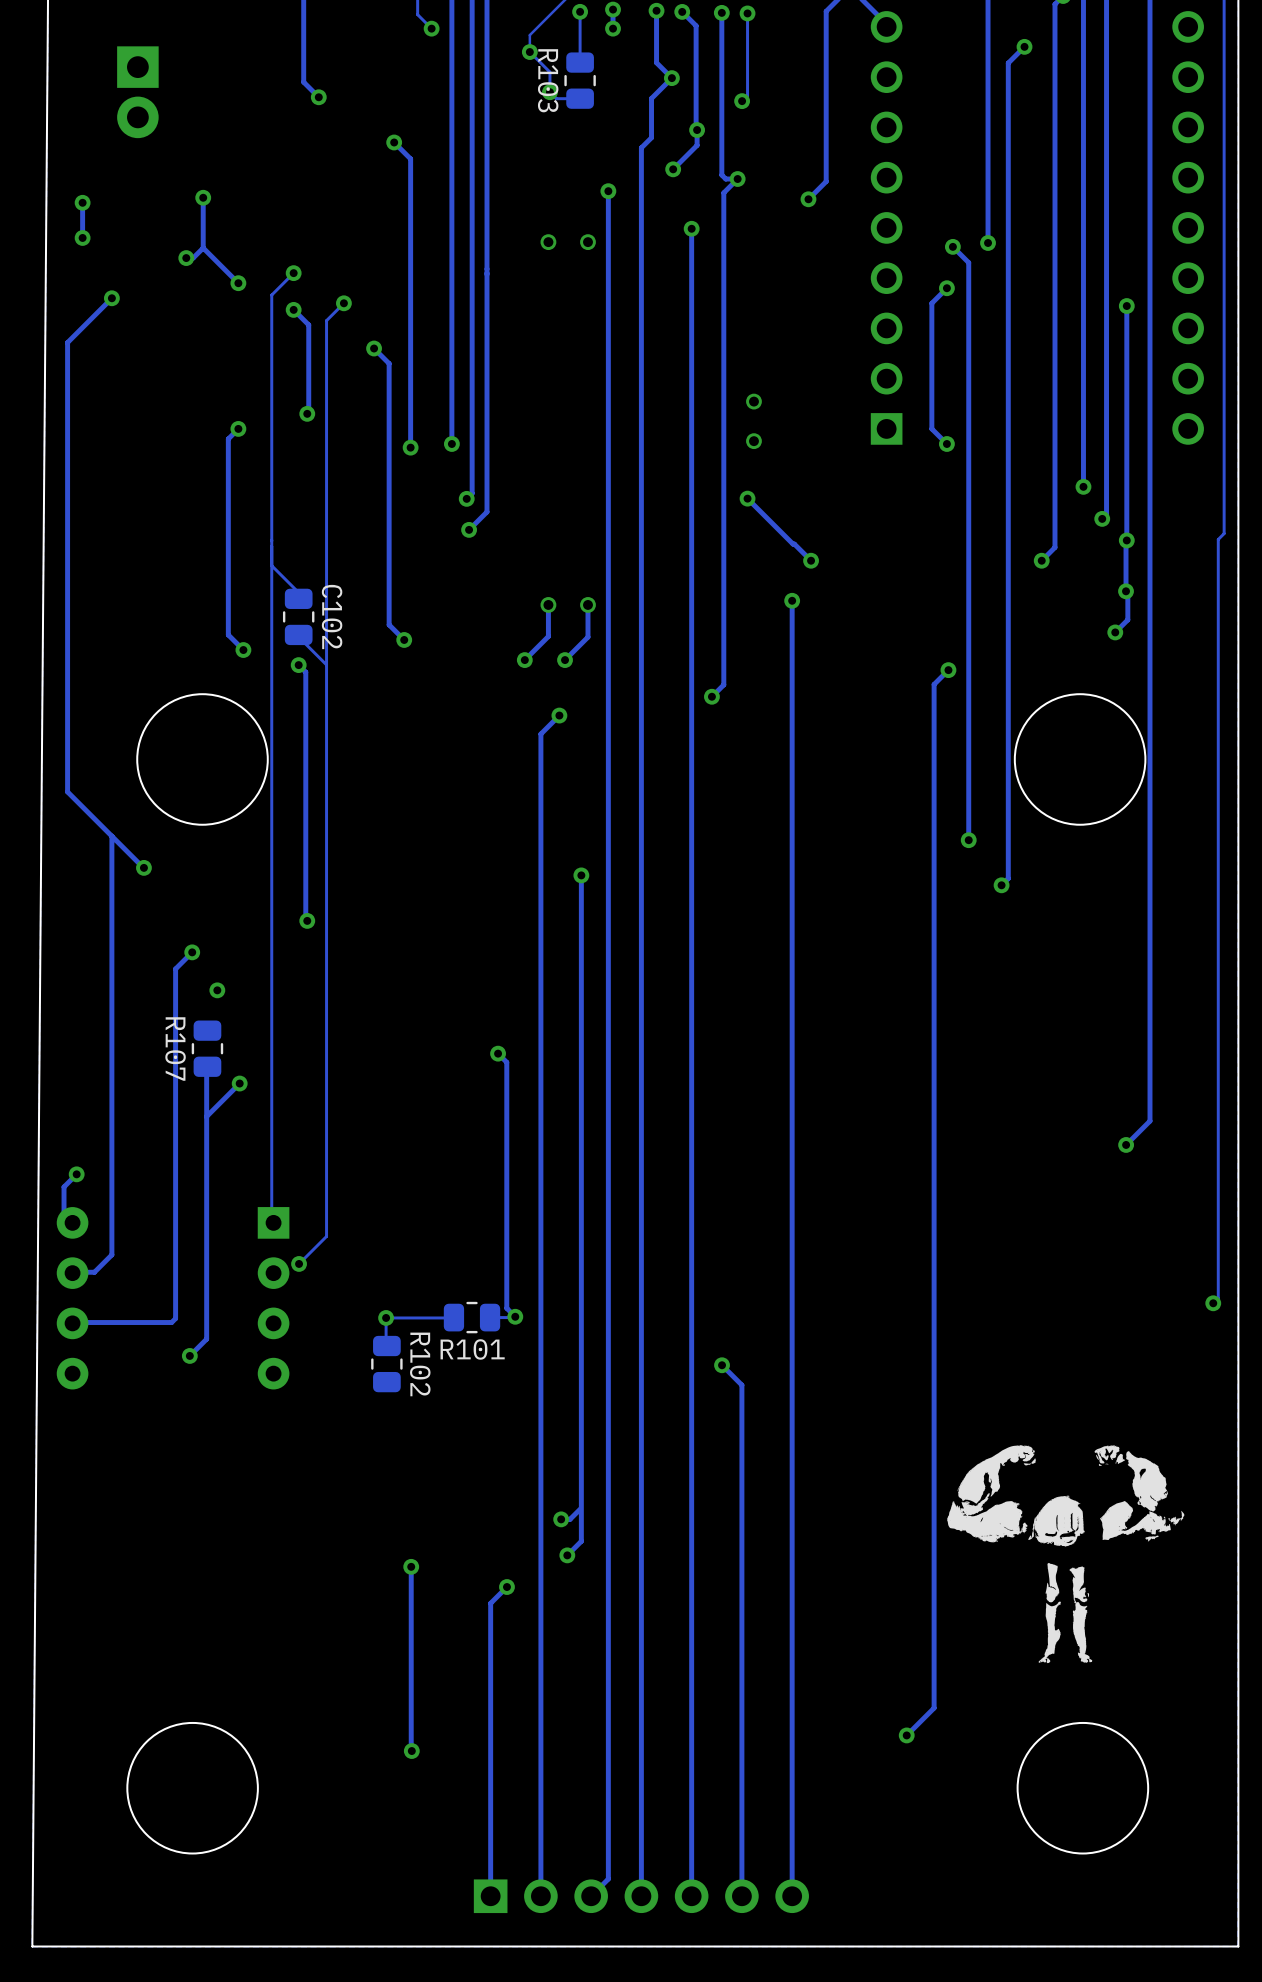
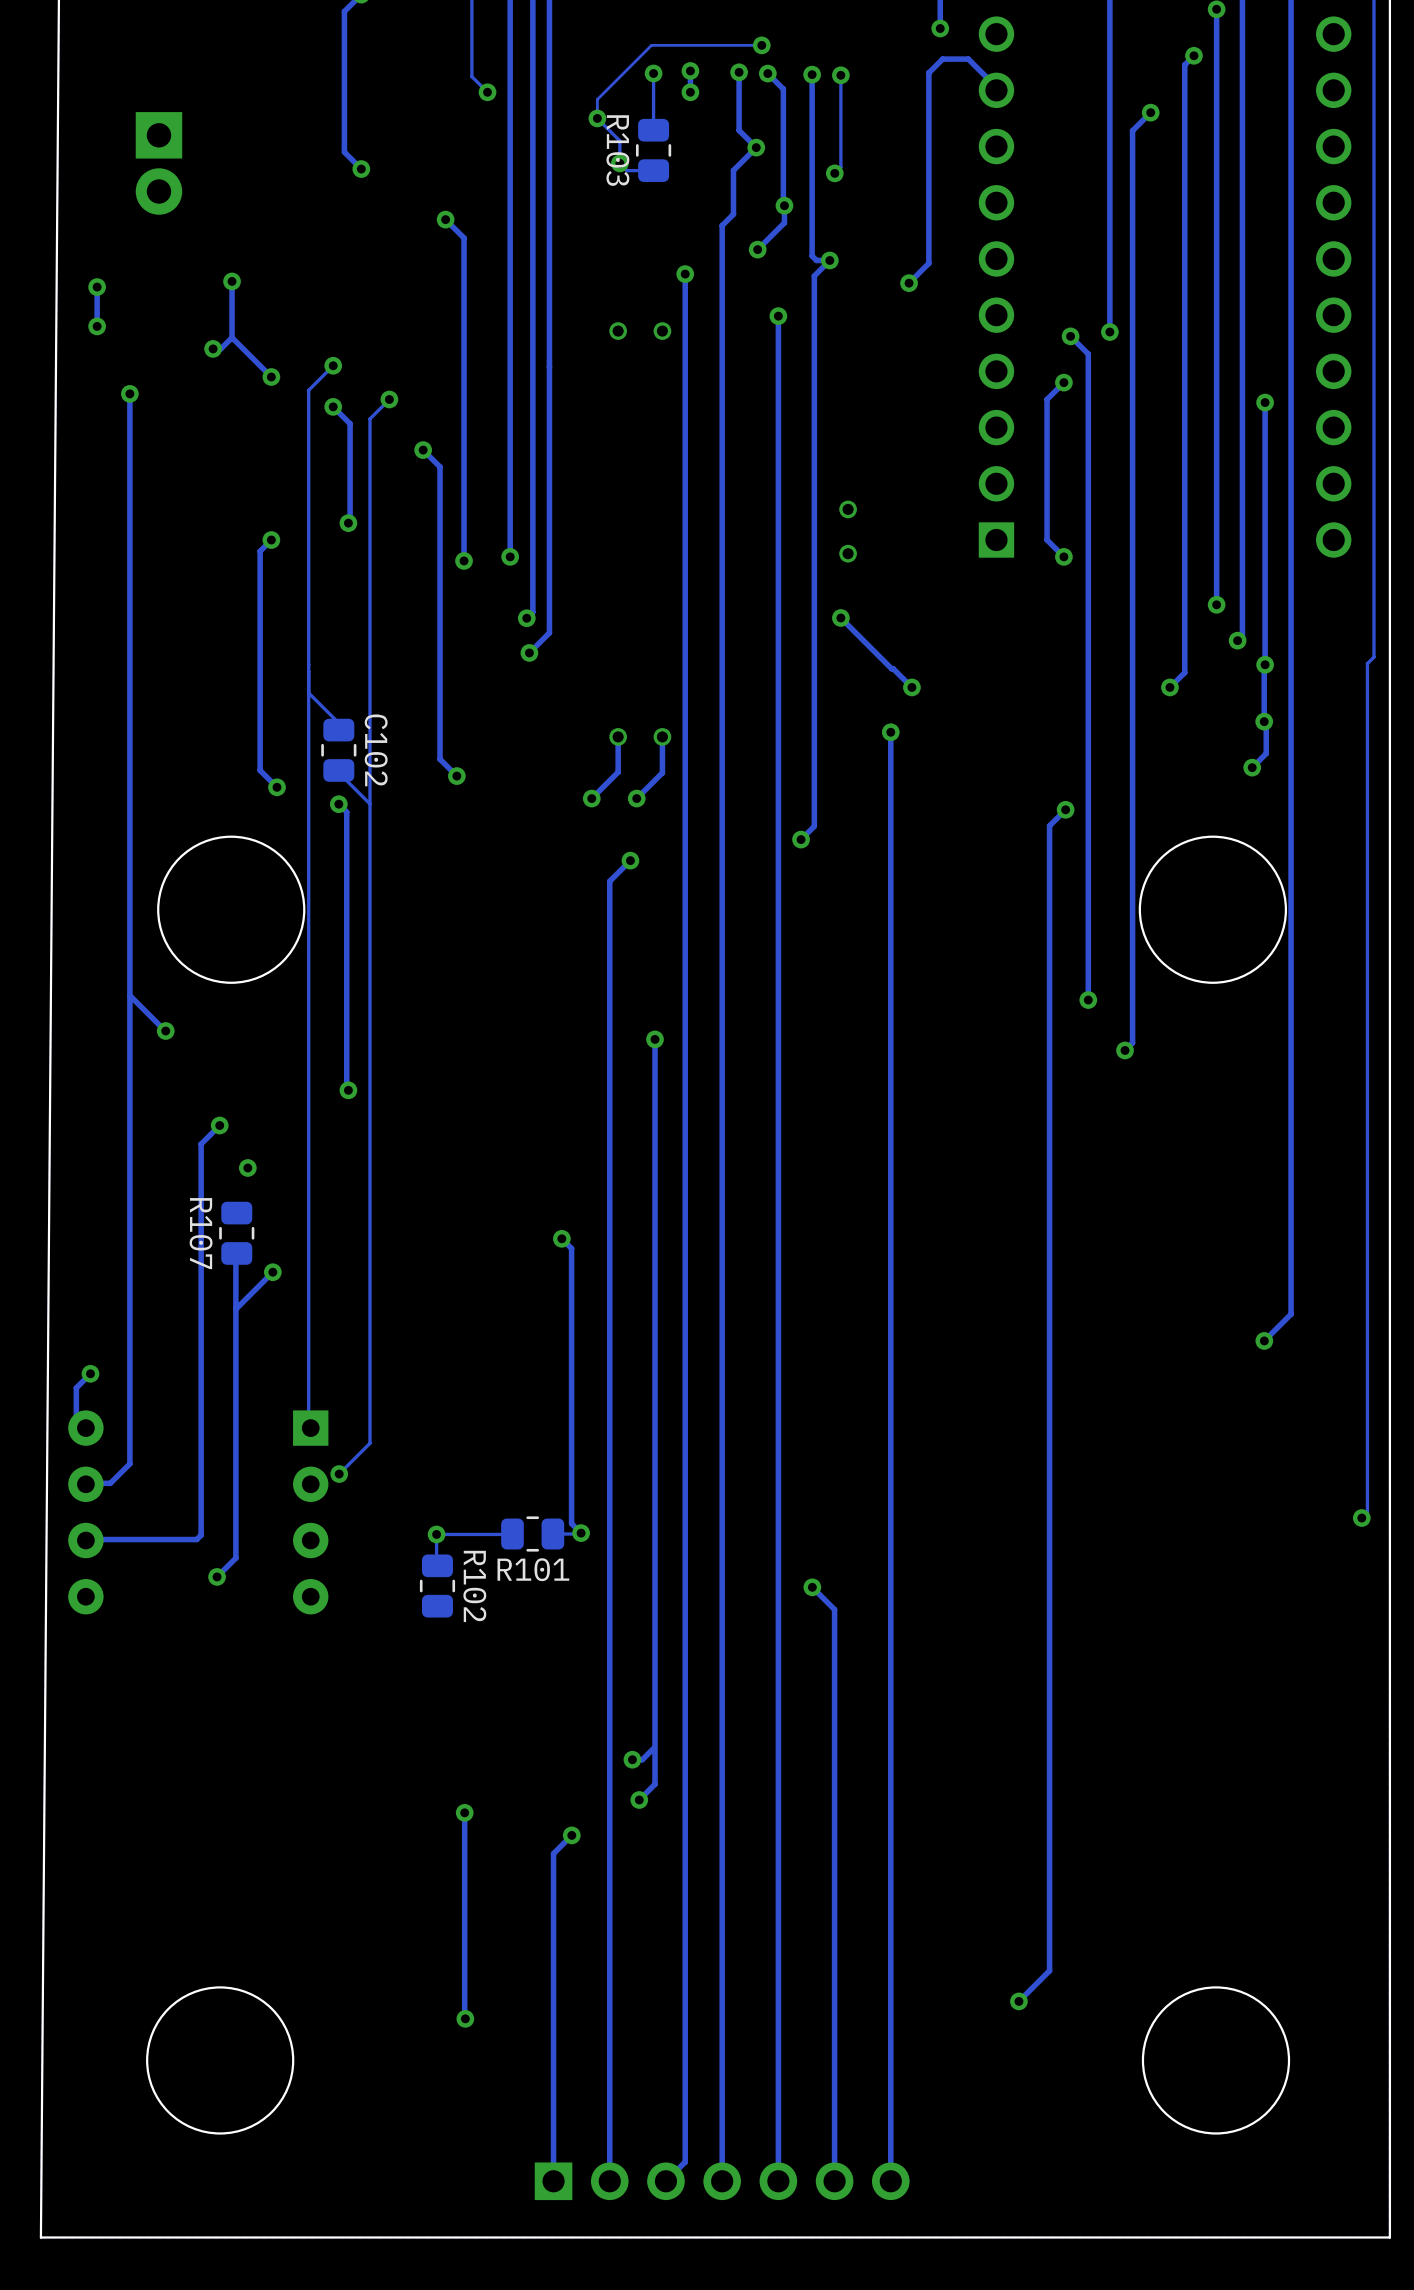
track: (111, 298) (67, 342) (67, 791) (111, 836) -> (129, 393) (129, 995)
drawing: [946, 1445, 1185, 1664] -> none

